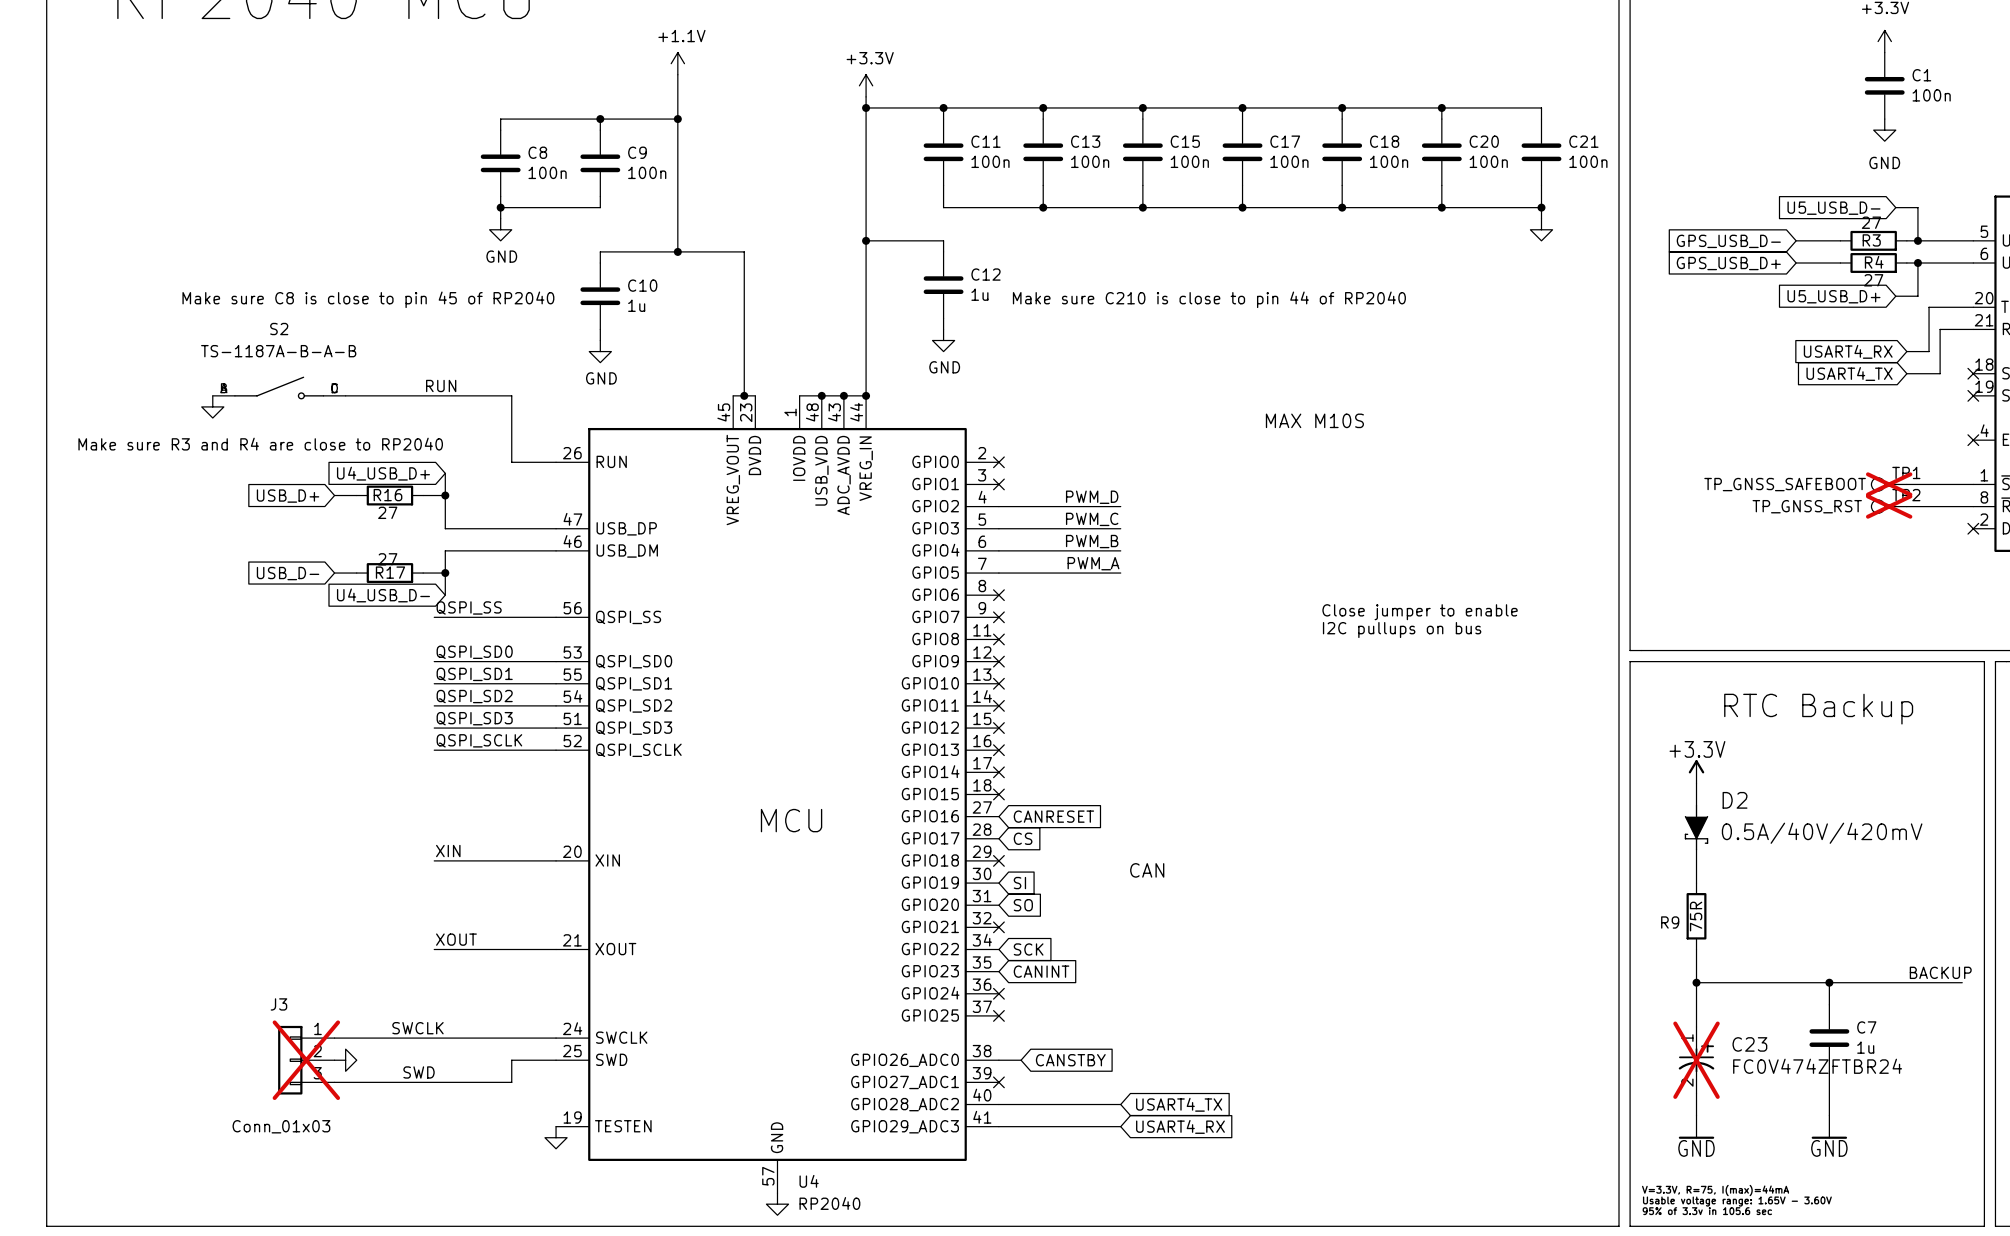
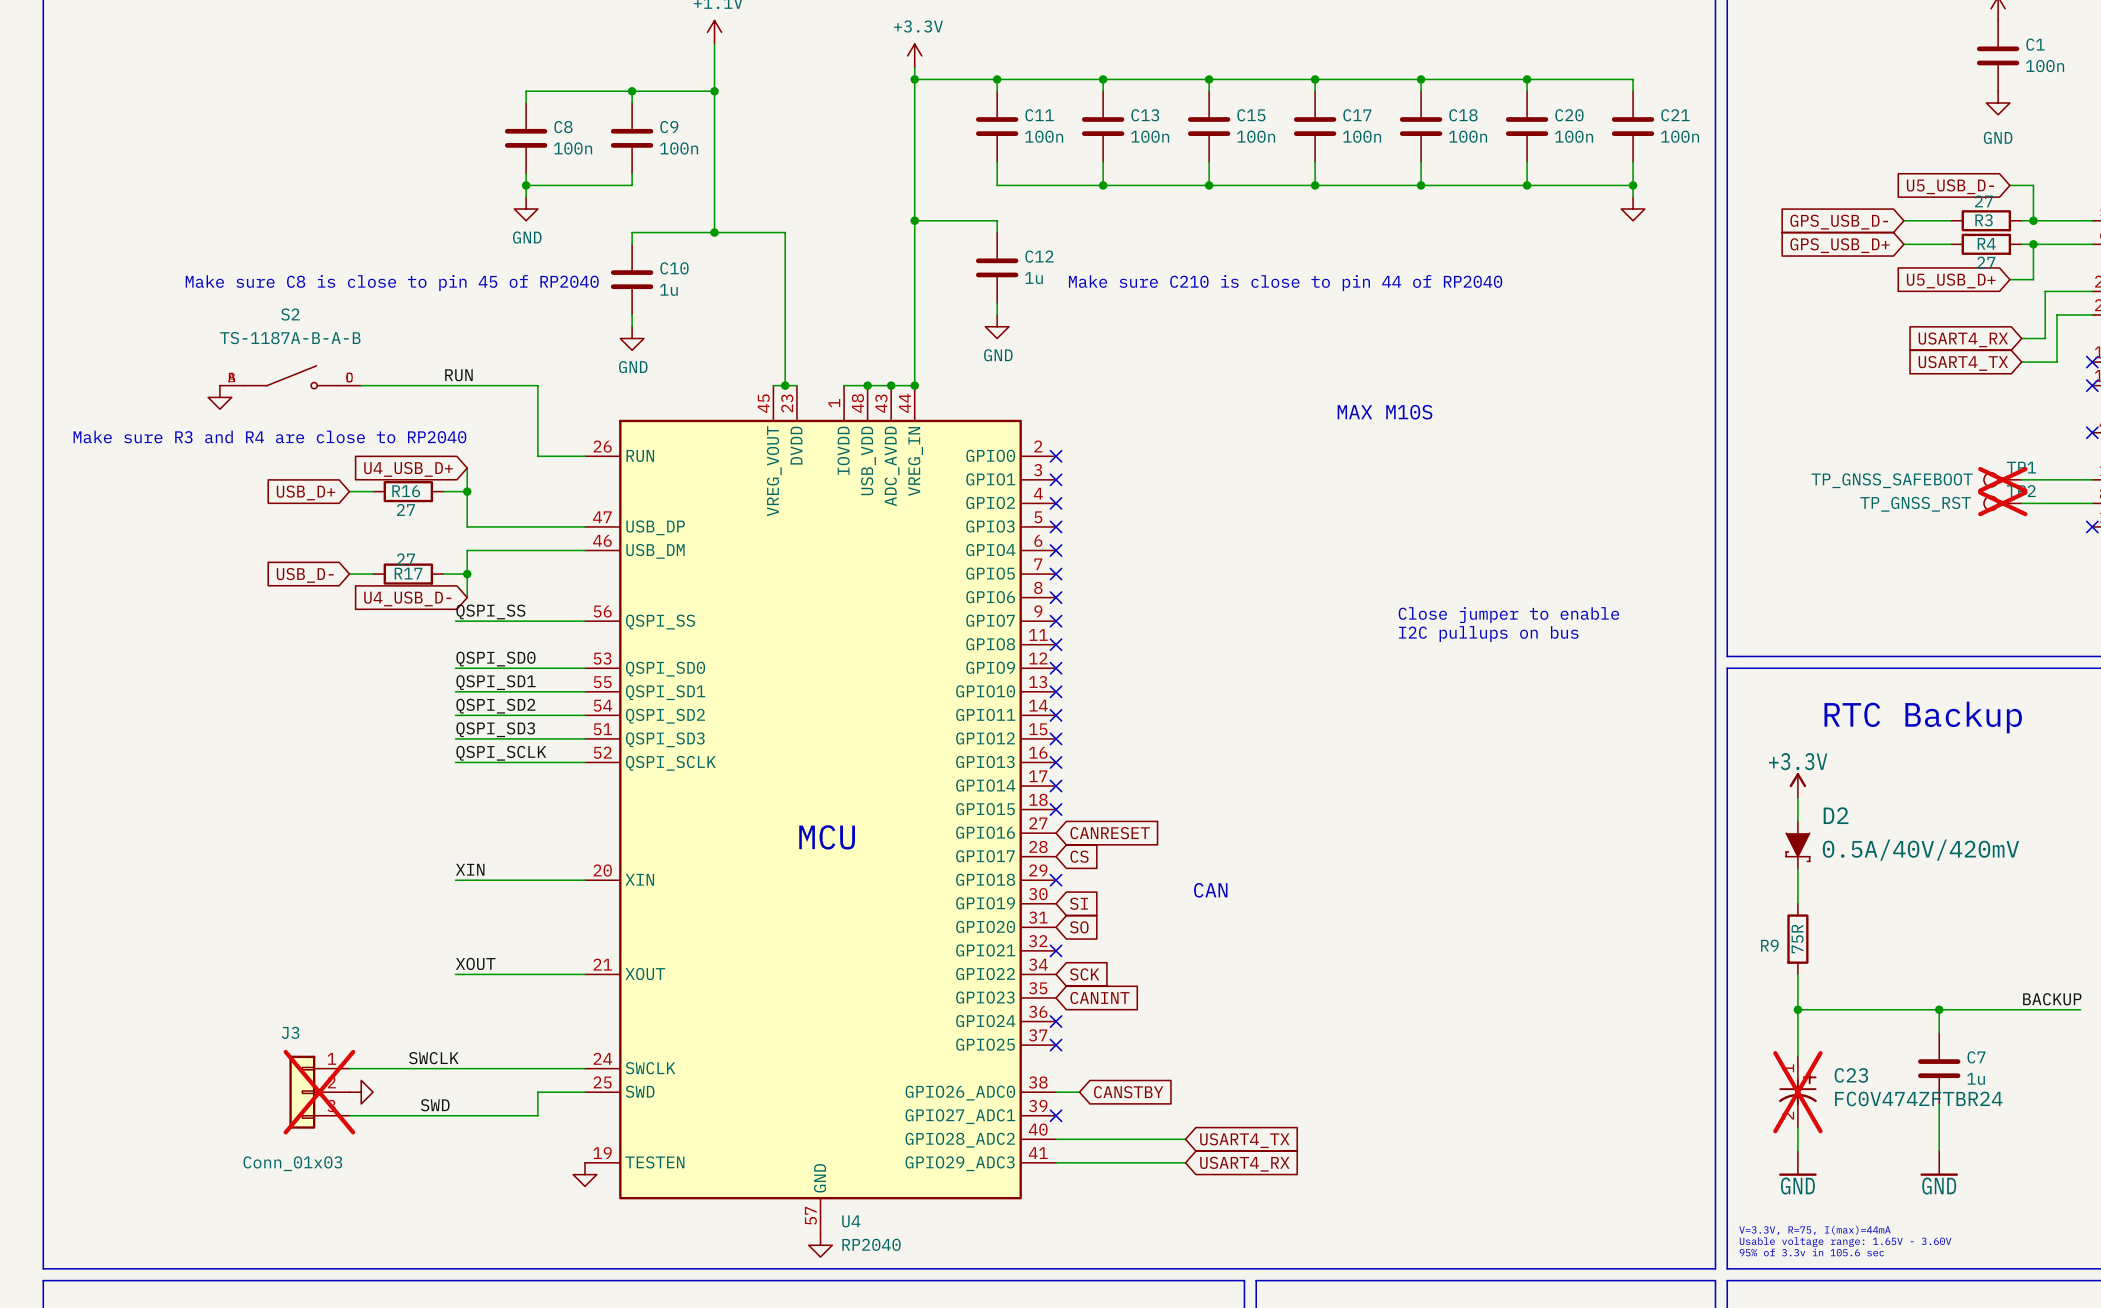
label: PWM_D (1092, 497) -> none
wire: (998, 506) (1120, 506) -> none
no-connect mark: none -> (1056, 503)
label: PWM_C (1092, 519) -> none
wire: (998, 528) (1120, 528) -> none
no-connect mark: none -> (1056, 526)
label: PWM_B (1092, 541) -> none
wire: (998, 550) (1120, 550) -> none
no-connect mark: none -> (1056, 550)
label: PWM_A (1093, 563) -> none
wire: (998, 573) (1120, 573) -> none
no-connect mark: none -> (1056, 574)

